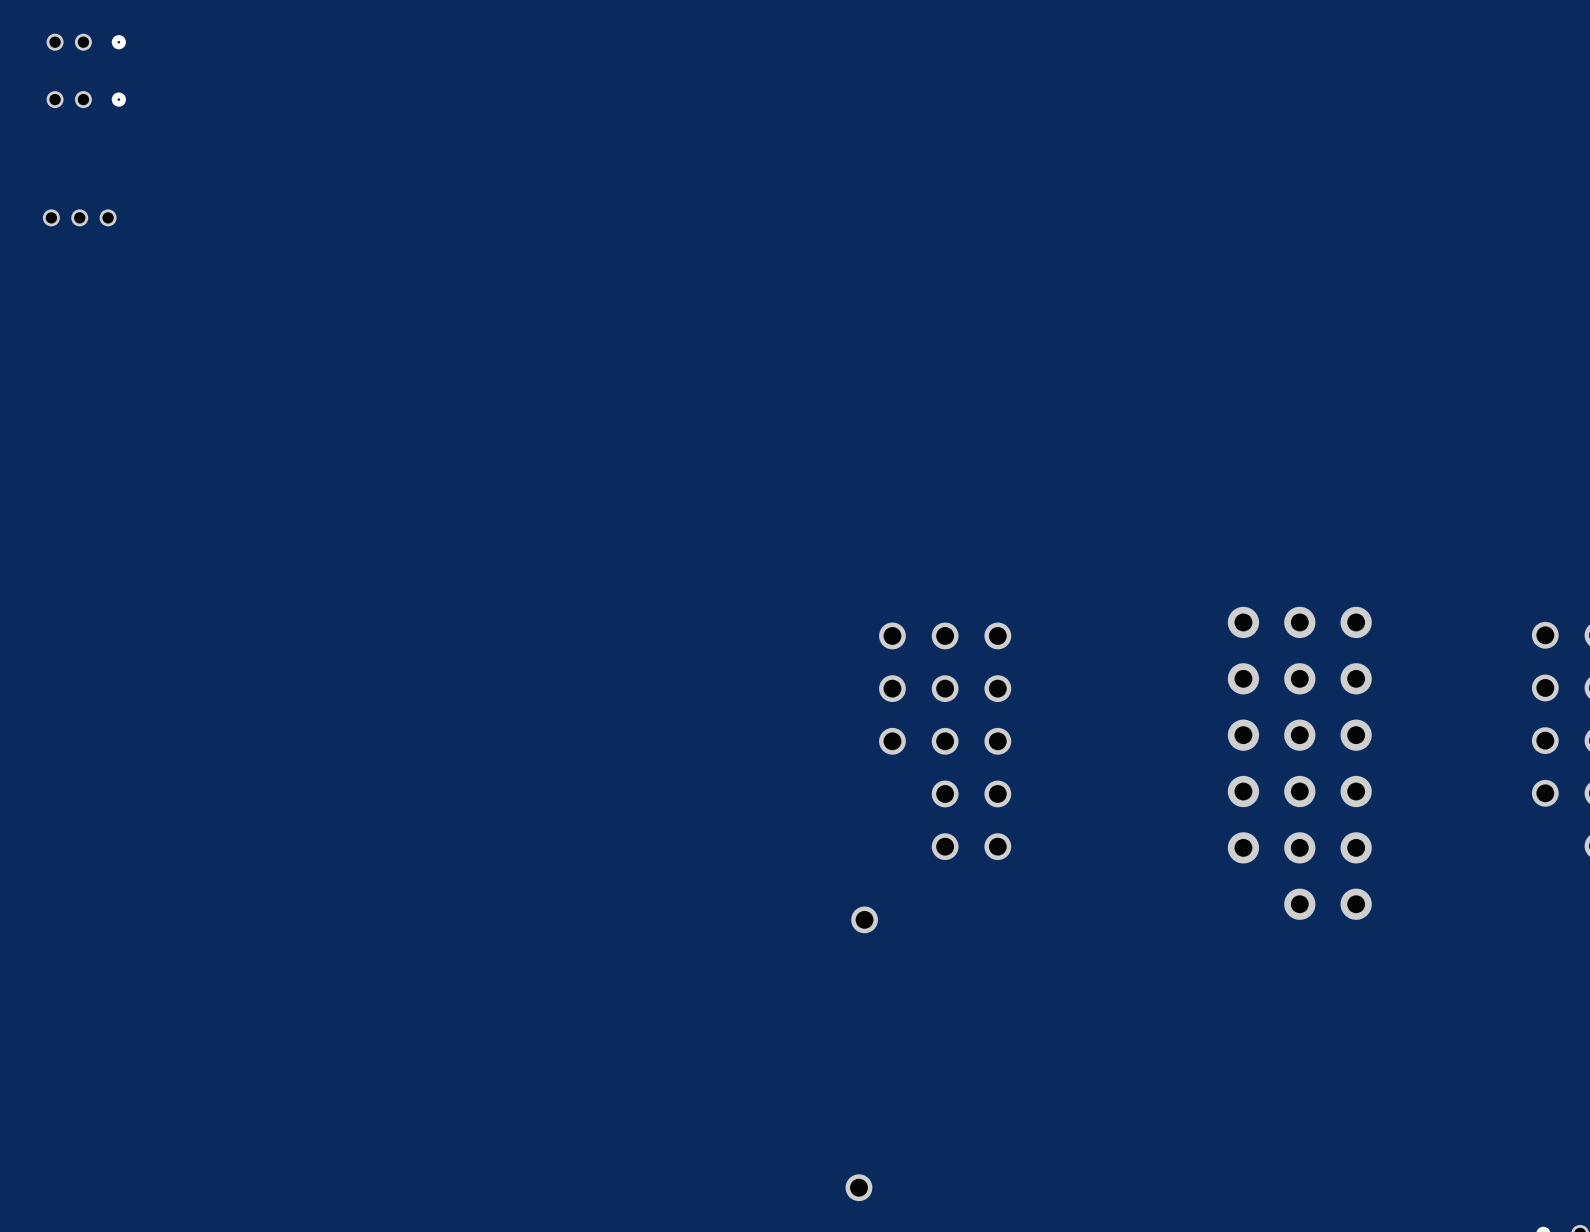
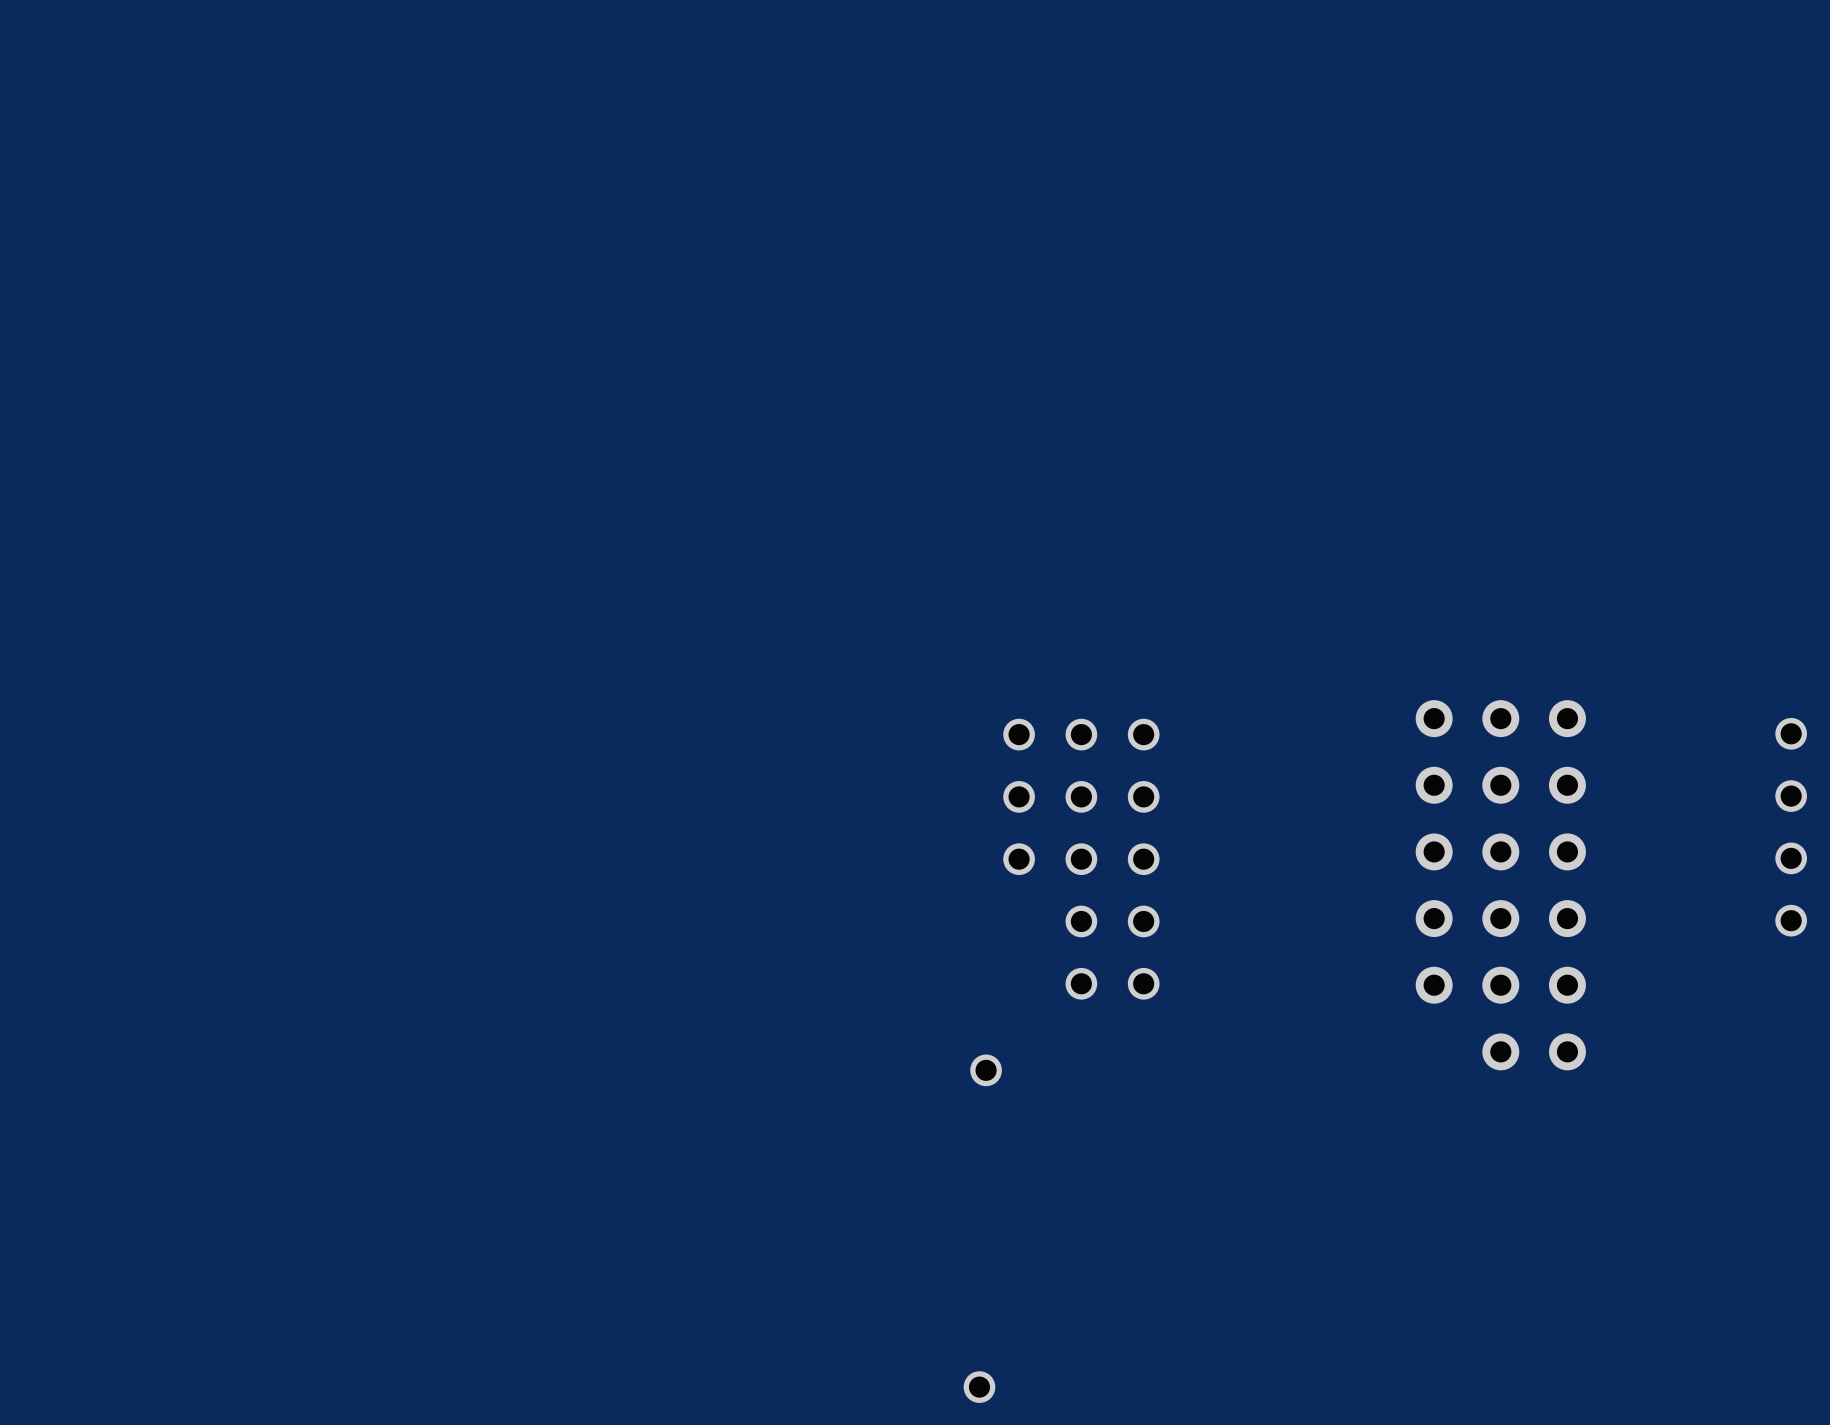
part: (86, 42) -> none
part: (86, 99) -> none
part: (79, 217) -> none

